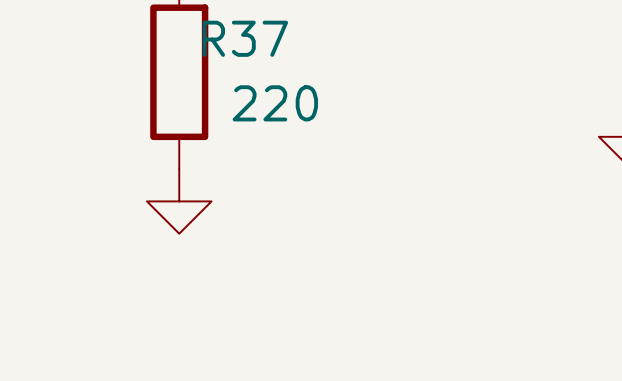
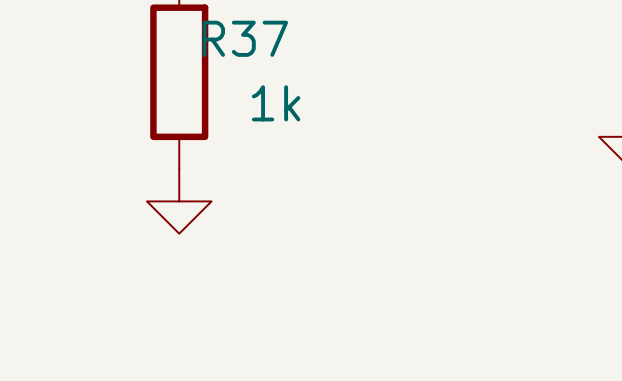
R37 value: 220 (275, 103) -> 1k (276, 103)

